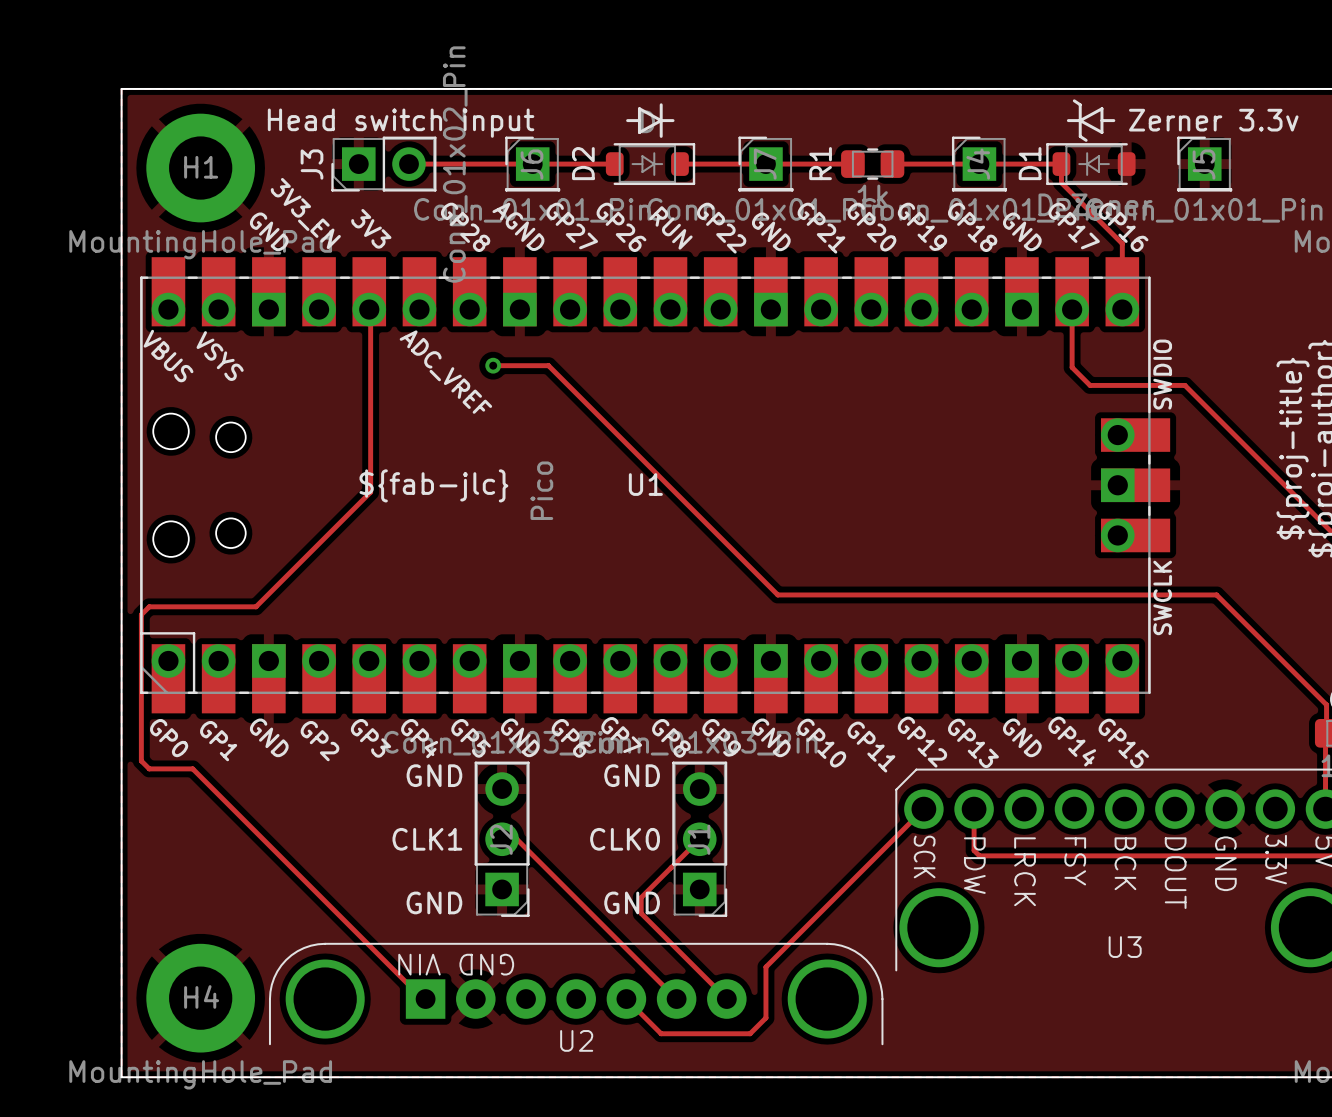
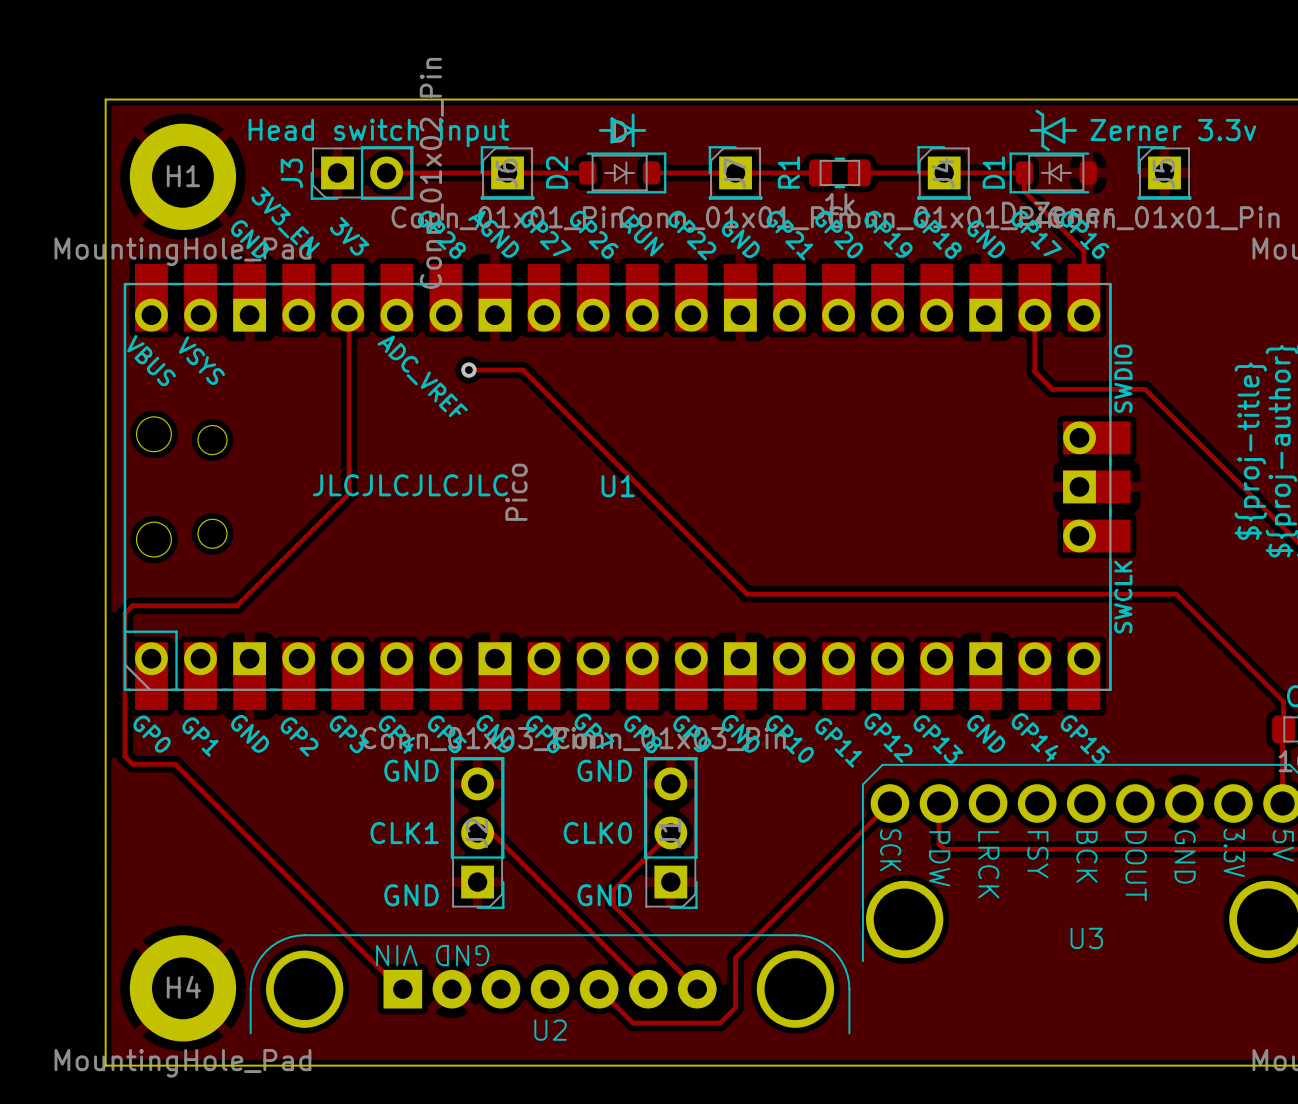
text: ${fab-jlc} (433, 485) -> JLCJLCJLCJLC (410, 485)

